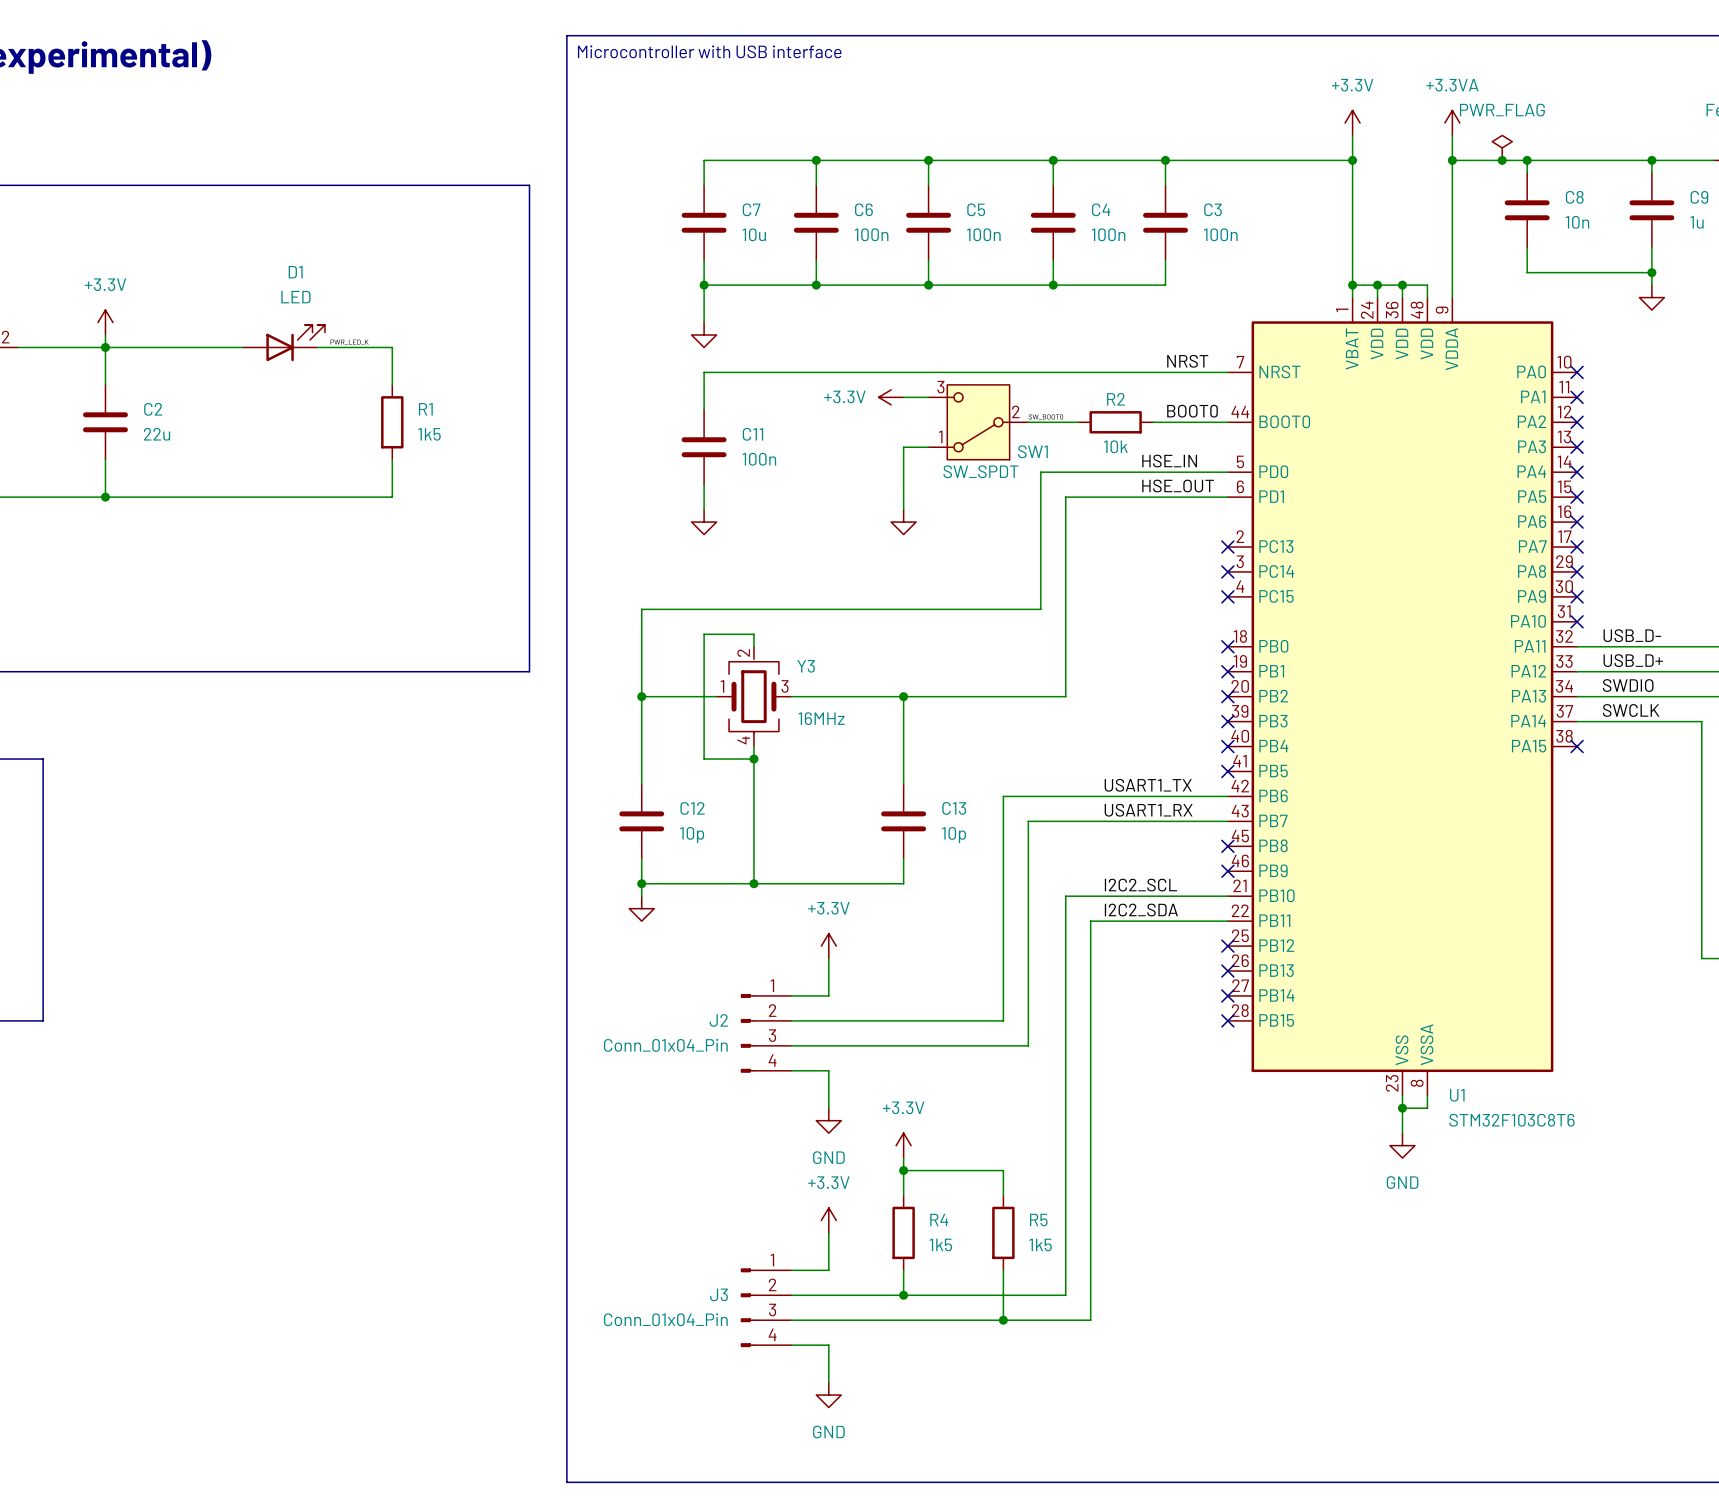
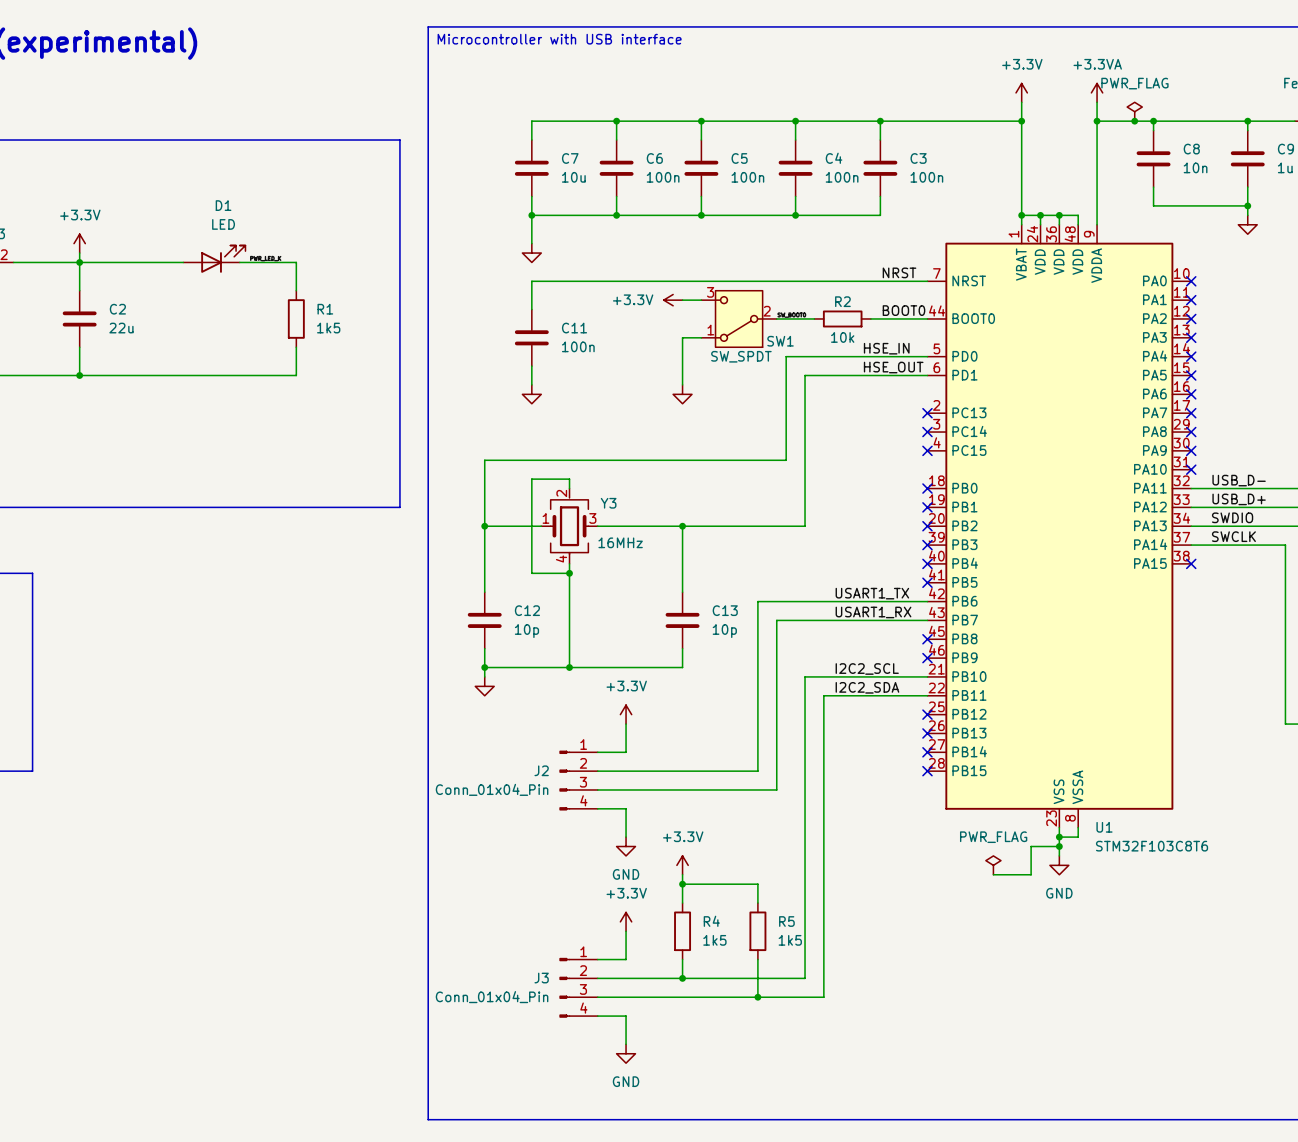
wire: none -> (1059, 846) (1031, 846) (1031, 874) (993, 874)
junction: none -> (1059, 846)
power symbol: none -> PWR_FLAG (993, 865)

